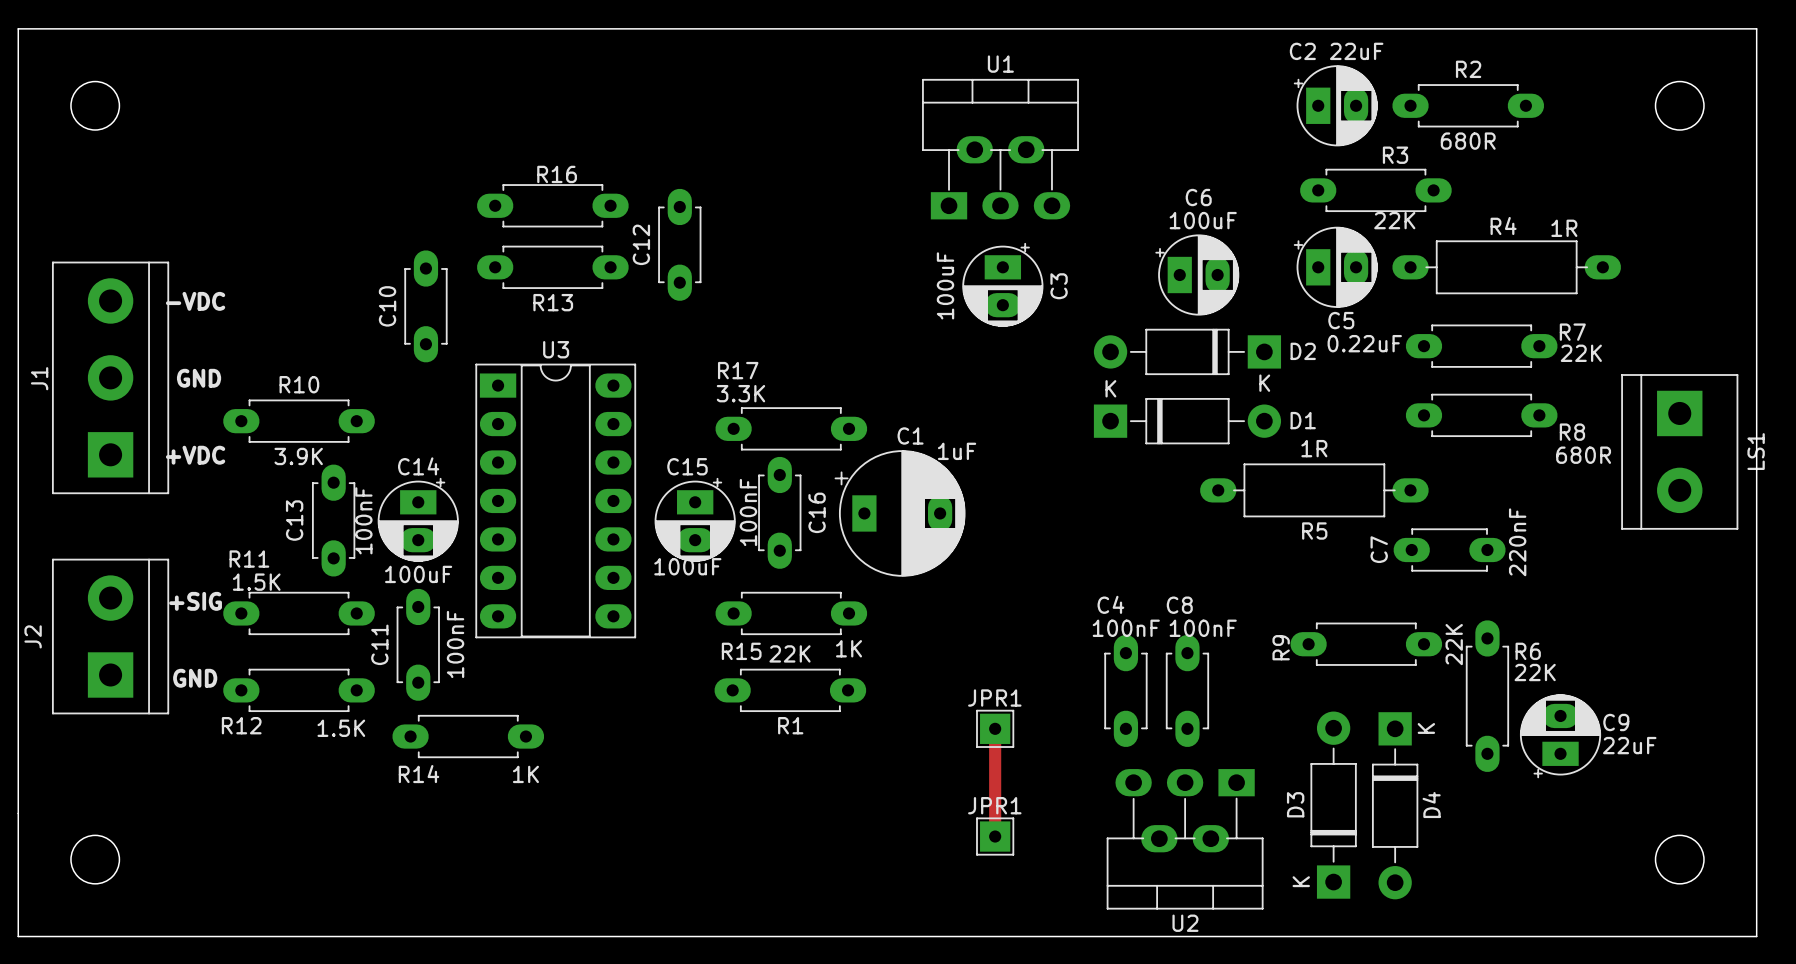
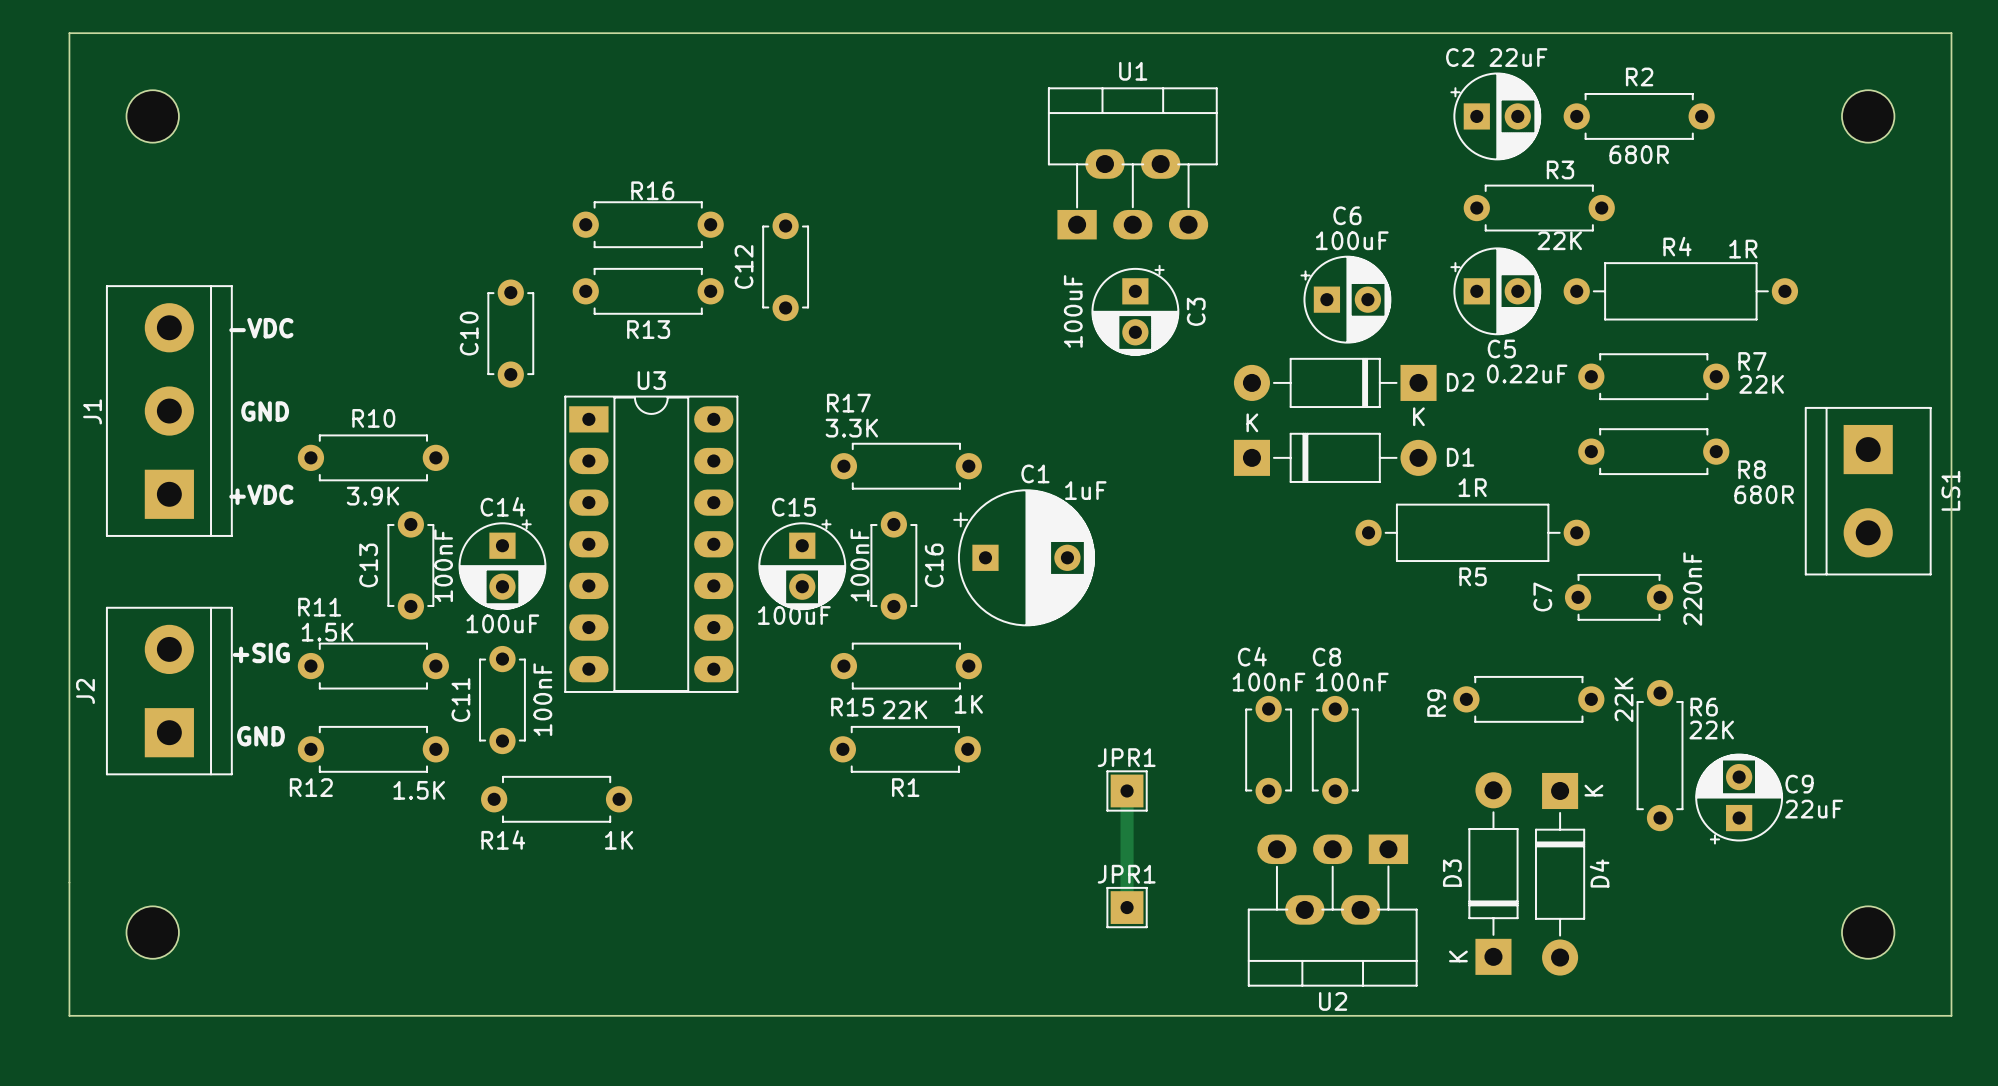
C2 footprint: [1293, 65, 1378, 147] -> [1450, 72, 1542, 161]
R2 footprint: [1392, 84, 1545, 128] -> [1563, 93, 1715, 140]
R3 footprint: [1300, 168, 1452, 213] -> [1463, 184, 1615, 232]
R16 footprint: [477, 184, 629, 228] -> [572, 201, 724, 249]
C12 footprint: [658, 188, 702, 301] -> [762, 212, 810, 322]
C5 footprint: [1293, 226, 1378, 308] -> [1450, 247, 1542, 336]
C6 footprint: [1155, 234, 1240, 316] -> [1300, 255, 1392, 344]
R4 footprint: [1392, 240, 1622, 295] -> [1563, 262, 1799, 321]
C3 footprint: [962, 242, 1044, 327] -> [1091, 264, 1180, 356]
R13 footprint: [477, 245, 629, 289] -> [572, 267, 724, 315]
C10 footprint: [404, 250, 448, 363] -> [487, 279, 535, 388]
R8 footprint: [1405, 324, 1558, 368] -> [1578, 353, 1730, 401]
R7 footprint: [1405, 393, 1558, 438] -> [1578, 428, 1730, 476]
R10 footprint: [223, 399, 375, 443] -> [297, 434, 449, 482]
R17 footprint: [715, 407, 868, 451] -> [830, 442, 982, 490]
C1 footprint: [834, 450, 966, 577] -> [953, 489, 1095, 627]
C16 footprint: [758, 456, 802, 569] -> [870, 511, 918, 620]
R5 footprint: [1200, 463, 1429, 518] -> [1355, 503, 1590, 563]
C13 footprint: [311, 464, 356, 577] -> [387, 511, 435, 620]
C14 footprint: [377, 477, 459, 562] -> [458, 519, 547, 611]
C15 footprint: [654, 477, 736, 562] -> [758, 519, 847, 611]
C7 footprint: [1393, 528, 1506, 572] -> [1564, 573, 1674, 621]
C11 footprint: [396, 588, 440, 701] -> [479, 645, 526, 755]
R11 footprint: [223, 591, 375, 636] -> [297, 642, 449, 690]
R15 footprint: [715, 591, 868, 636] -> [830, 642, 982, 690]
R6 footprint: [1465, 620, 1510, 773] -> [1636, 680, 1684, 832]
R9 footprint: [1290, 622, 1443, 666] -> [1453, 675, 1605, 723]
C4 footprint: [1104, 634, 1148, 748] -> [1245, 695, 1293, 805]
C8 footprint: [1165, 634, 1210, 748] -> [1311, 695, 1359, 805]
R12 footprint: [223, 668, 375, 713] -> [297, 725, 449, 773]
R1 footprint: [714, 668, 867, 713] -> [829, 725, 981, 773]
C9 footprint: [1519, 694, 1602, 779] -> [1695, 753, 1784, 845]
R14 footprint: [392, 714, 545, 759] -> [481, 775, 633, 823]

